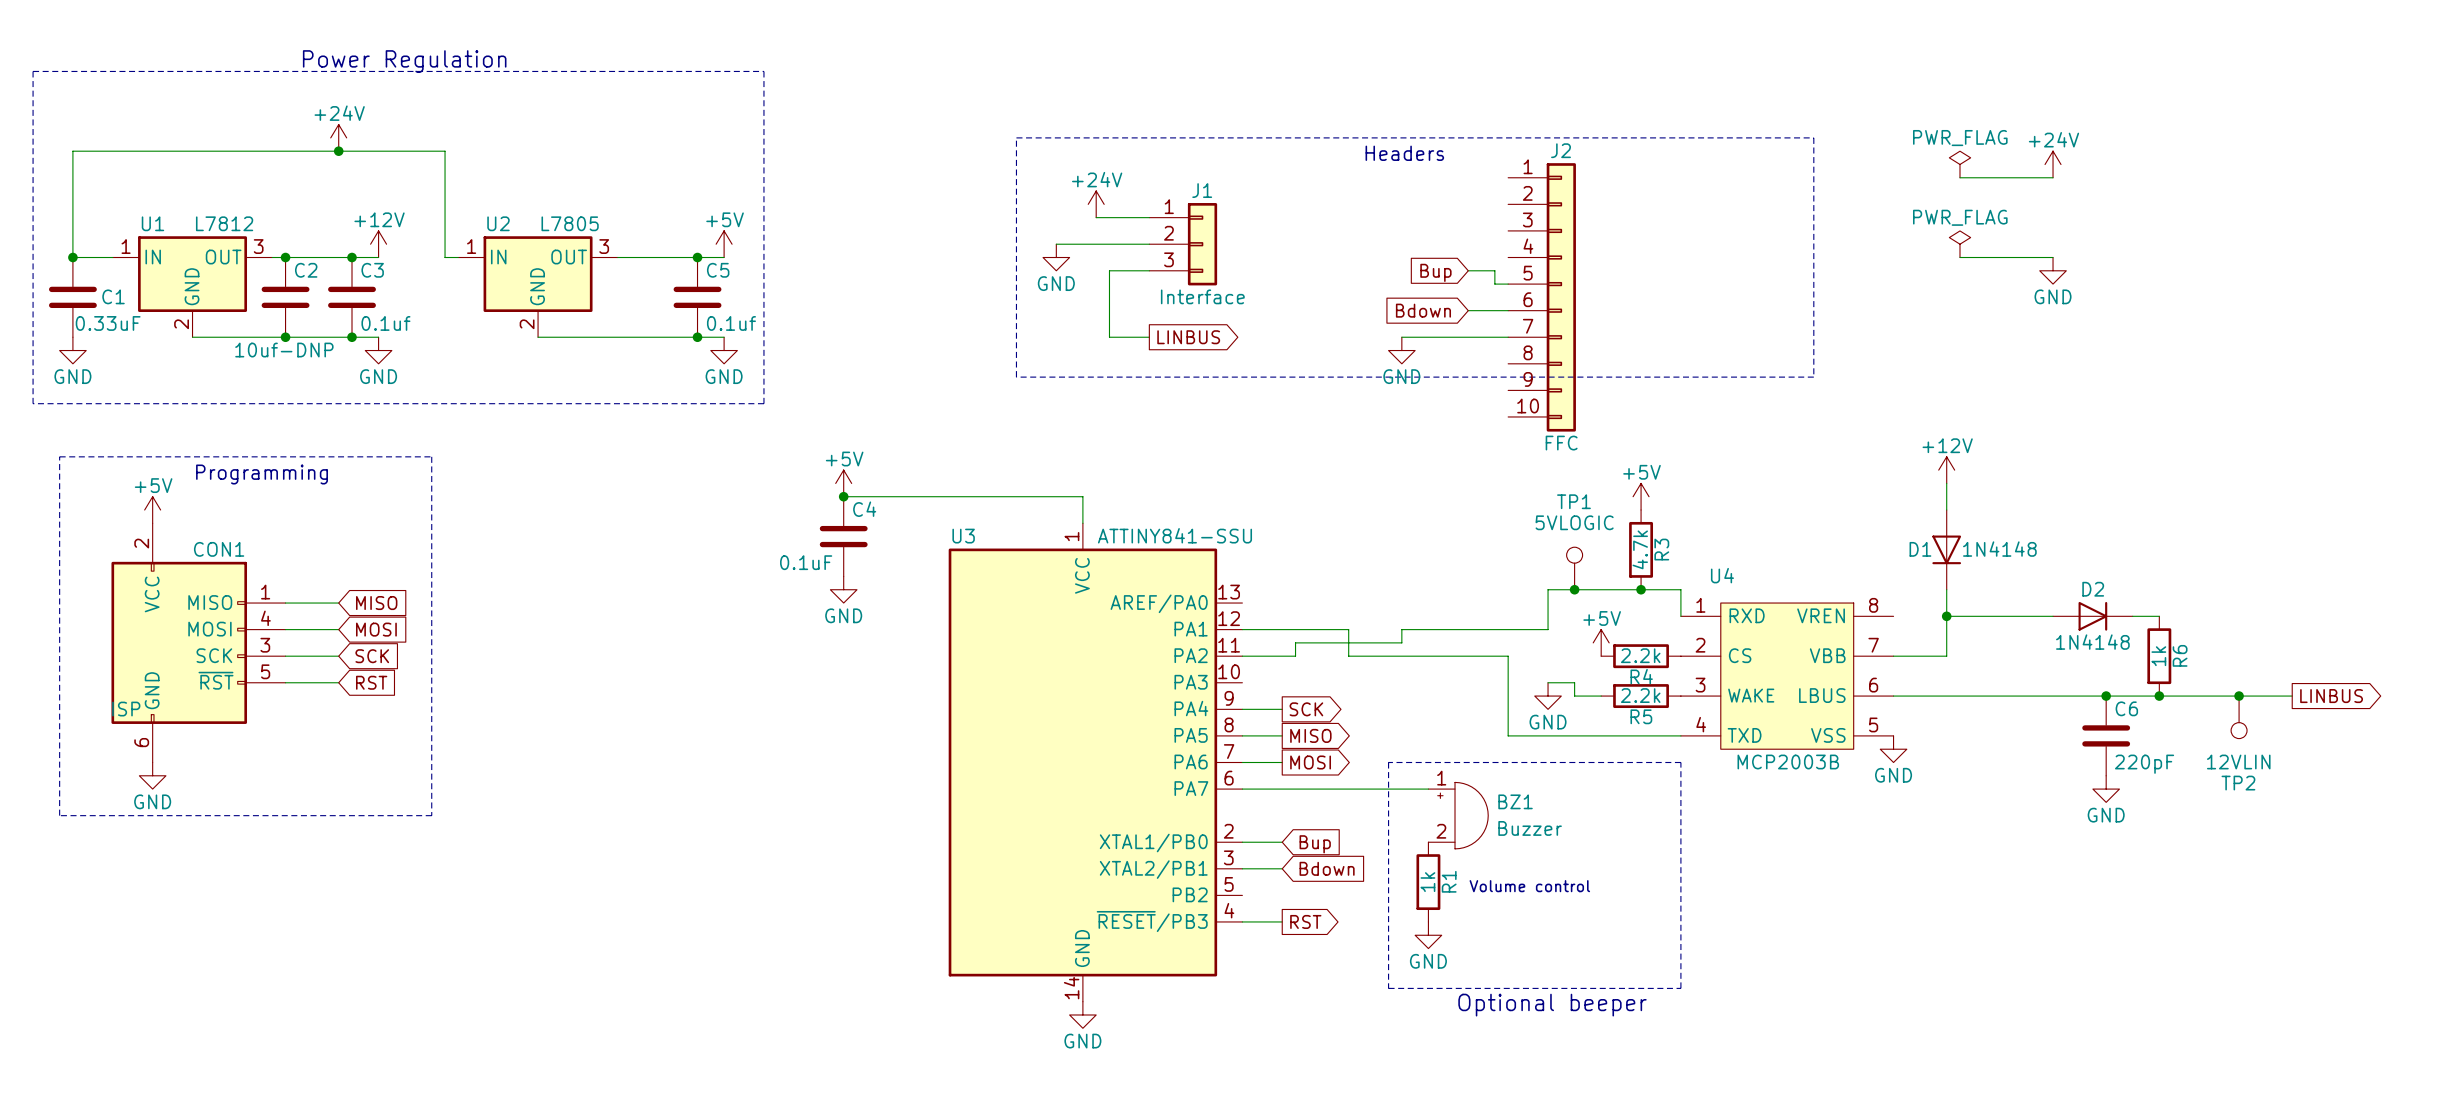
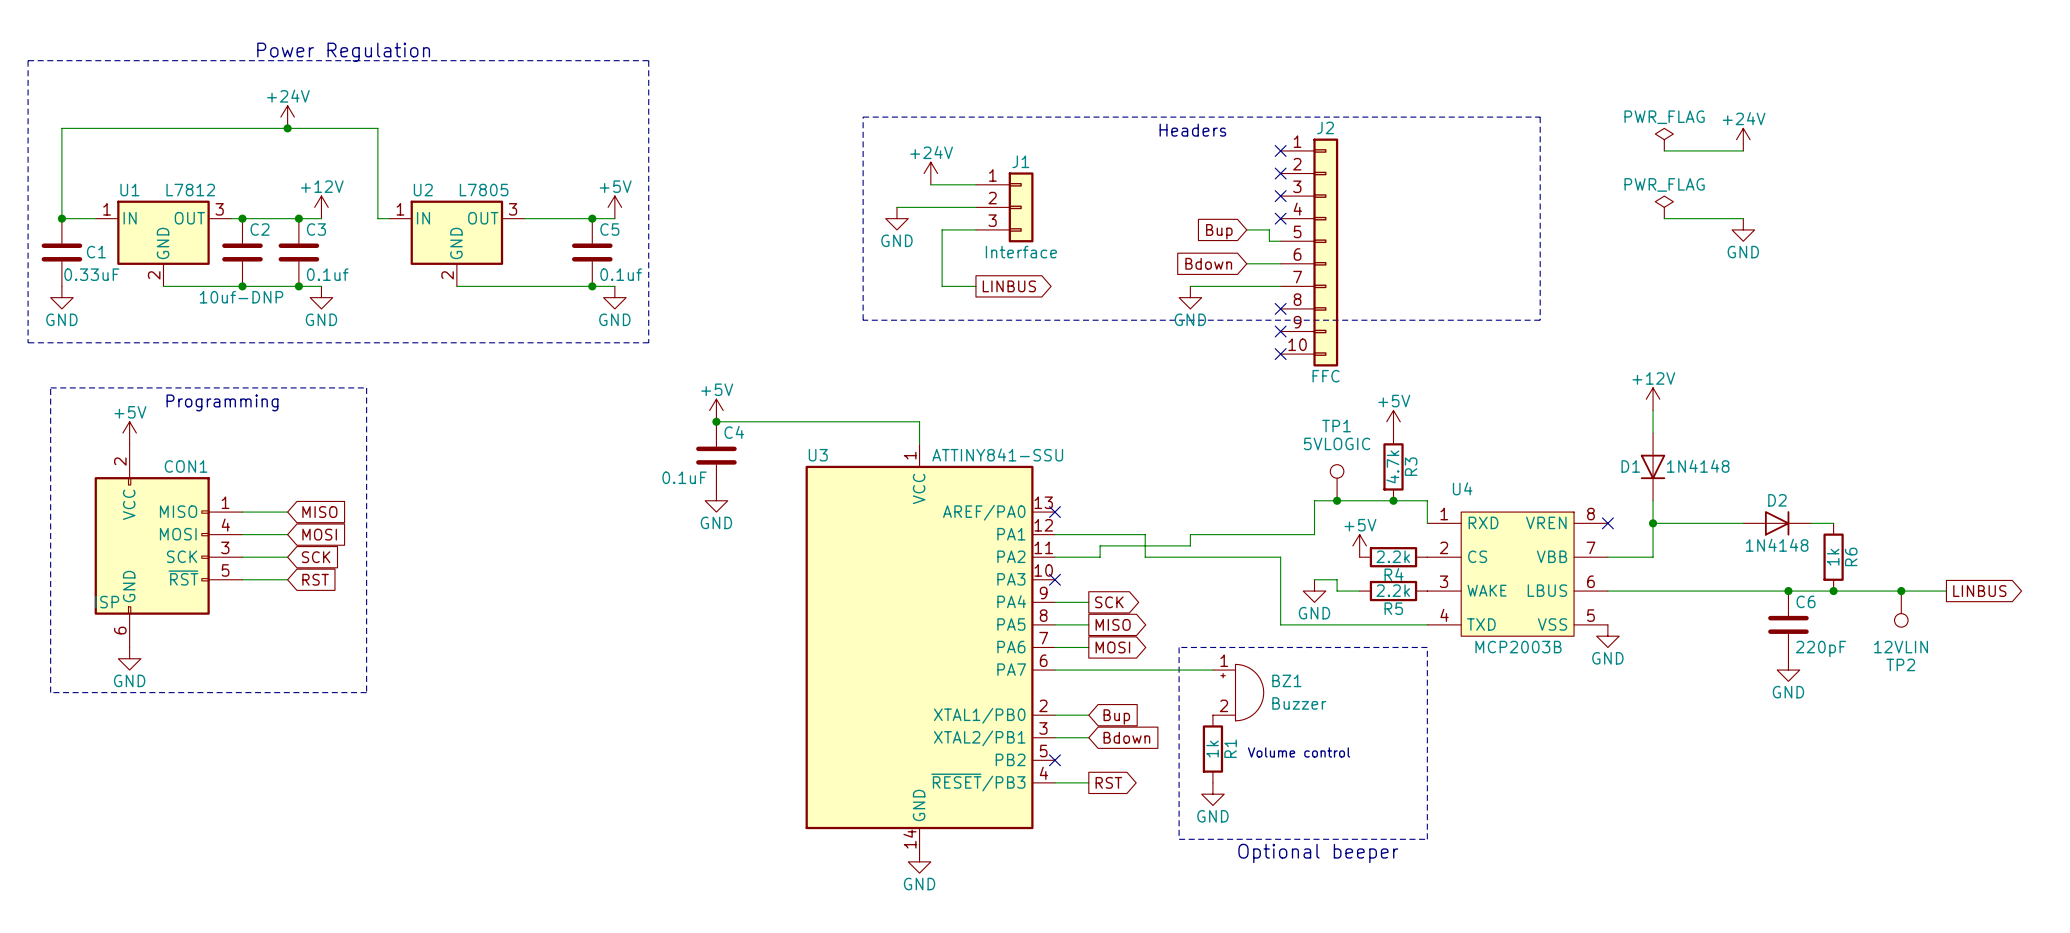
no-connect mark: none -> (1280, 150)
no-connect mark: none -> (1280, 173)
no-connect mark: none -> (1280, 196)
no-connect mark: none -> (1280, 218)
no-connect mark: none -> (1280, 308)
no-connect mark: none -> (1280, 331)
no-connect mark: none -> (1280, 354)
no-connect mark: none -> (1054, 512)
no-connect mark: none -> (1607, 523)
no-connect mark: none -> (1054, 579)
no-connect mark: none -> (1054, 760)

